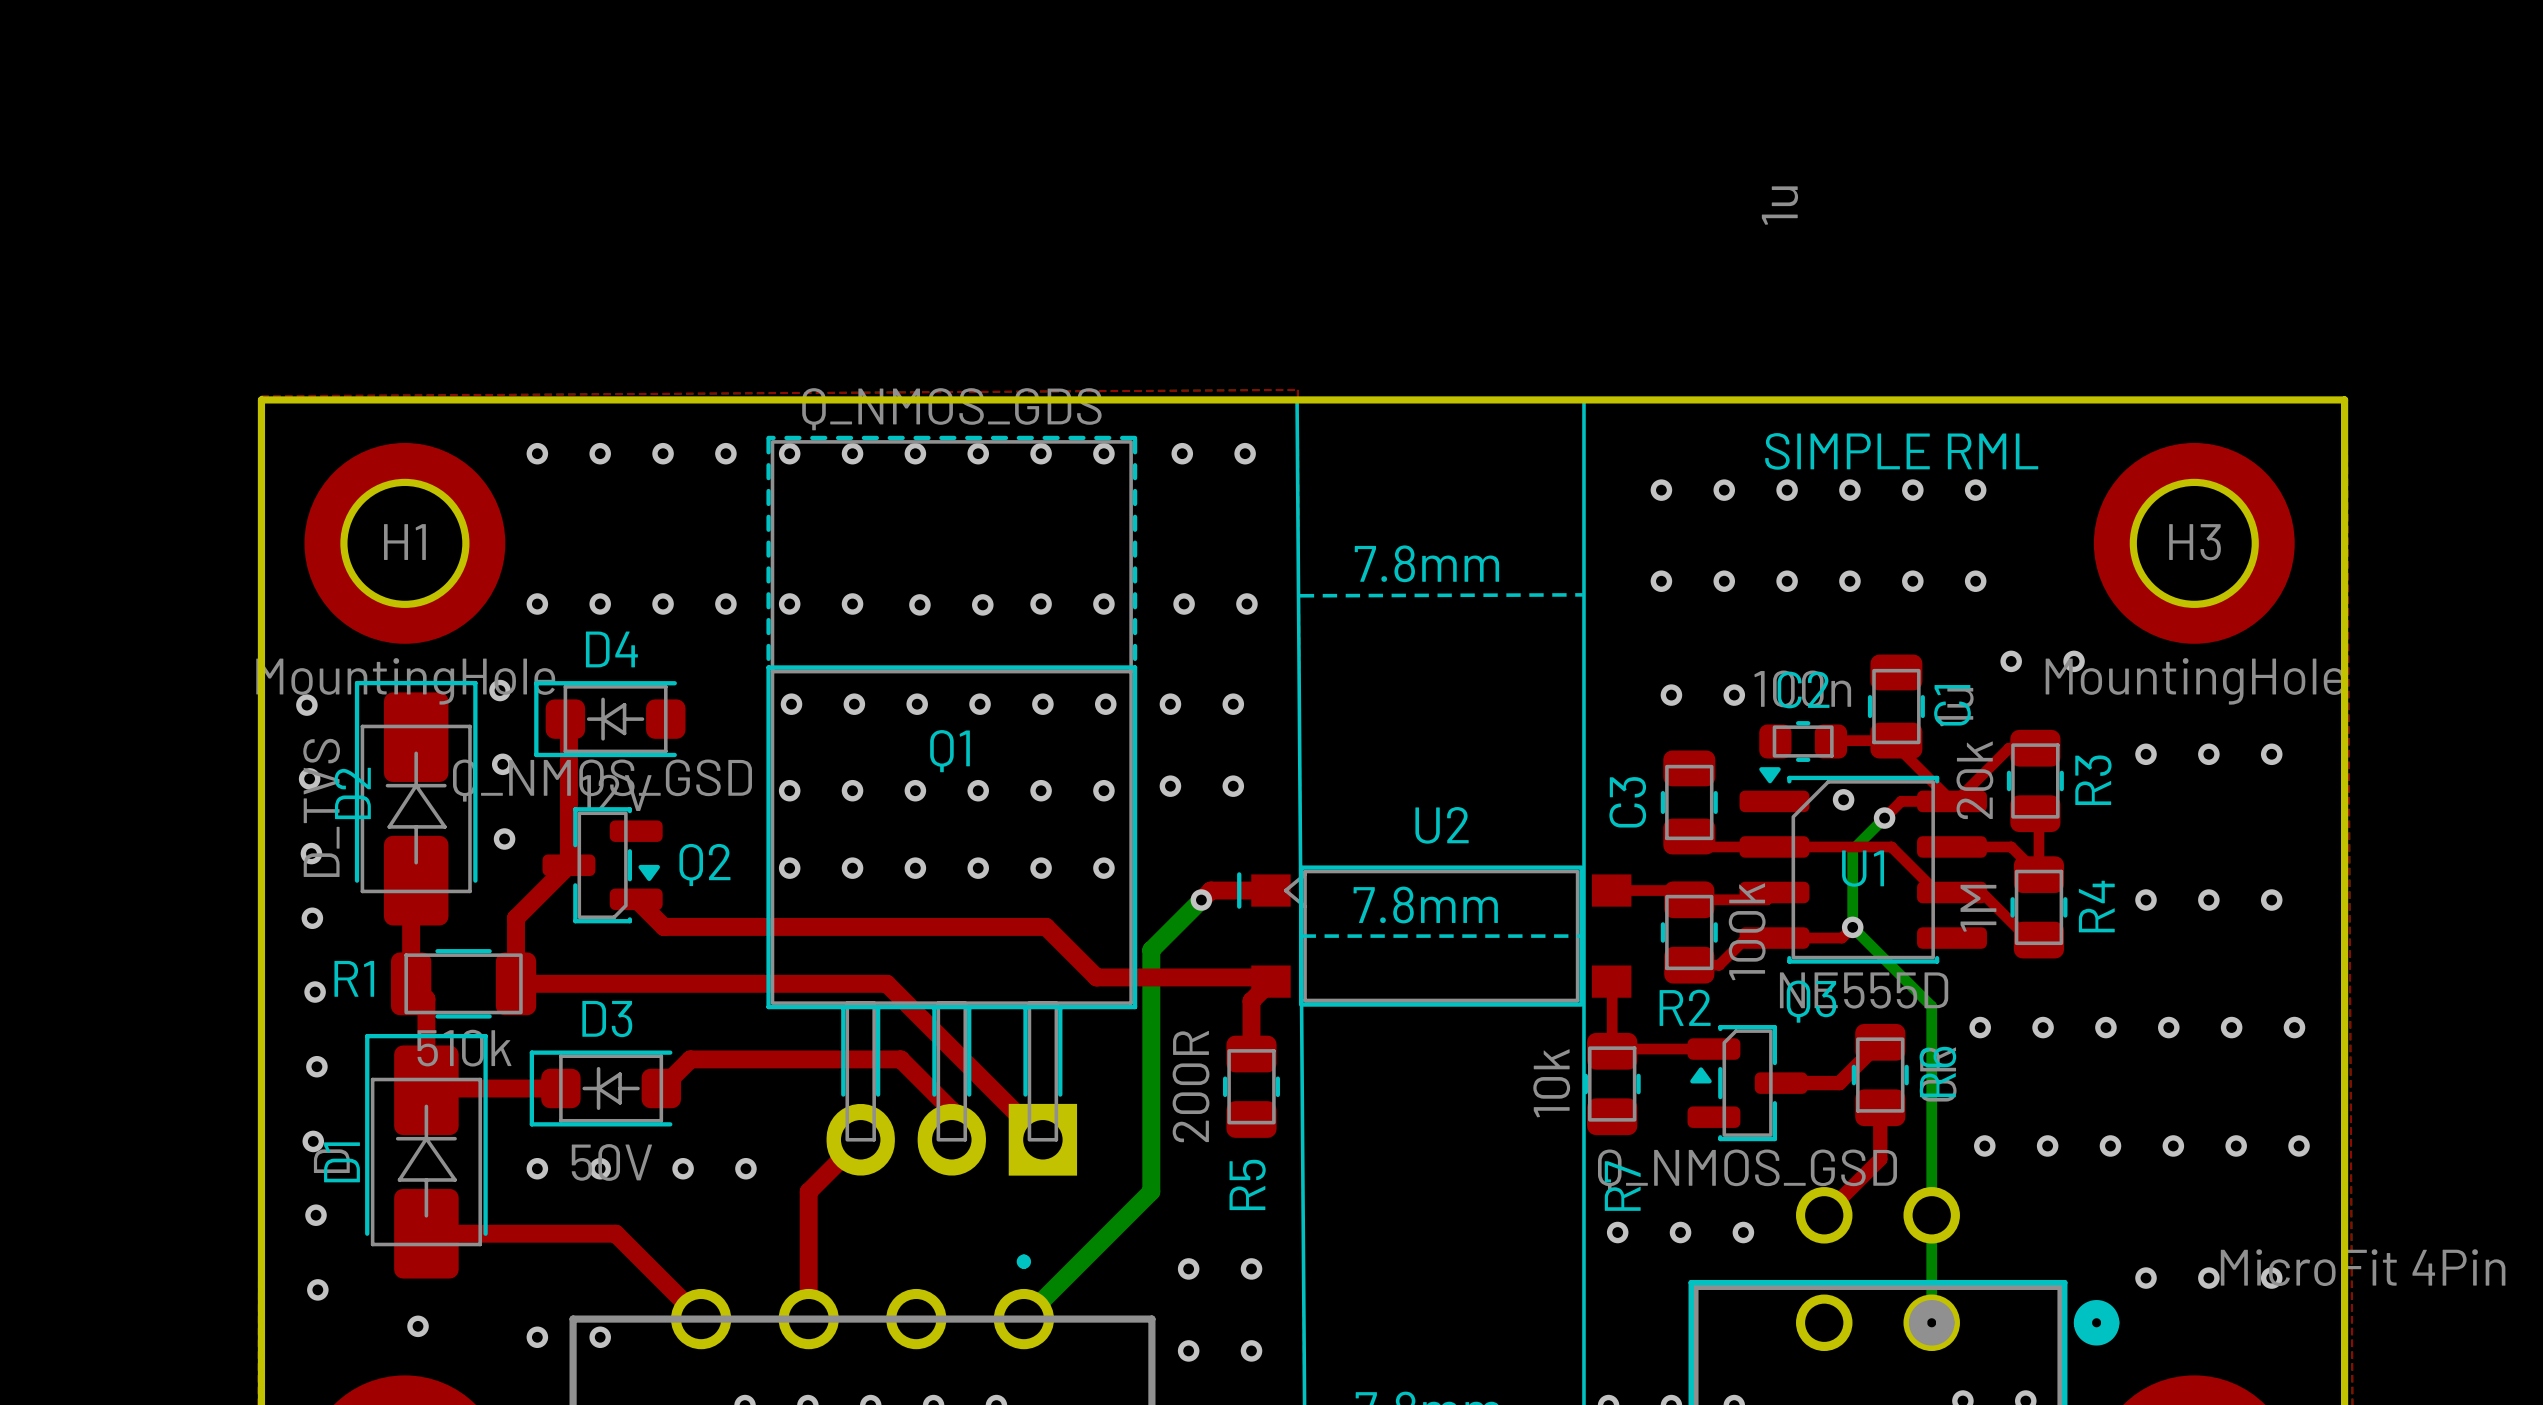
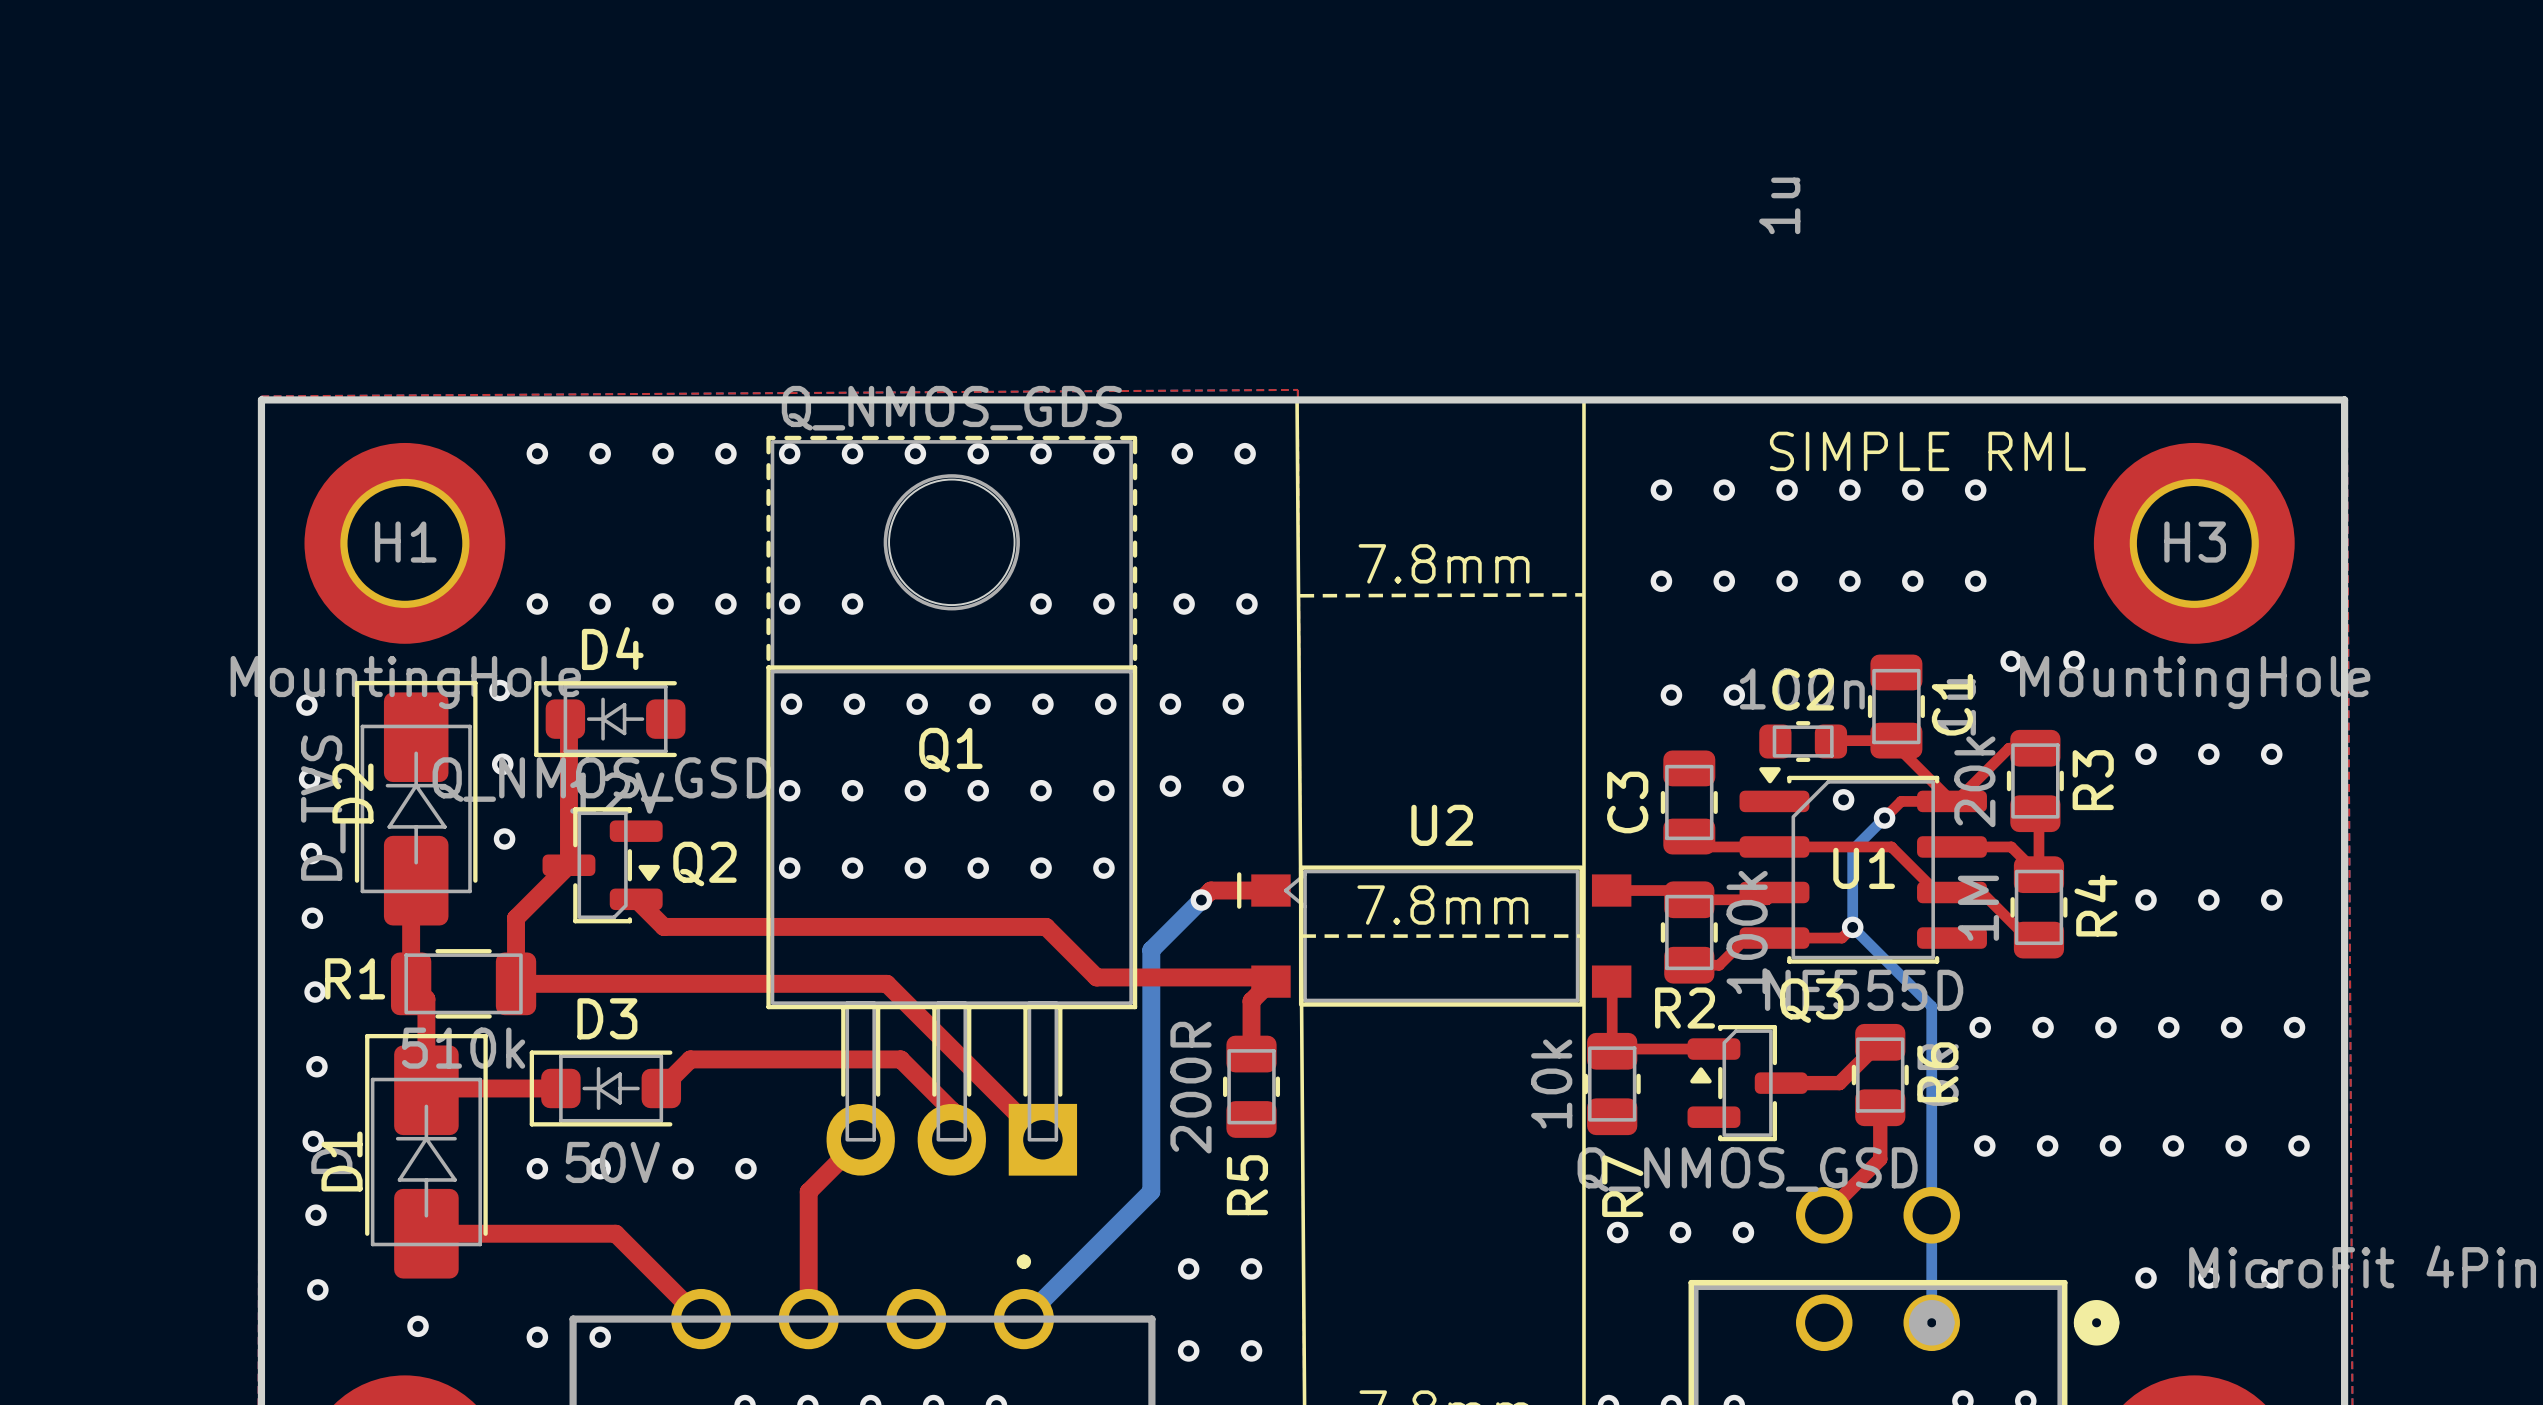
Q1 footprint: [766, 435, 1138, 1176] -> [766, 435, 1138, 1176]
via: (919, 604) -> none
via: (982, 604) -> none

